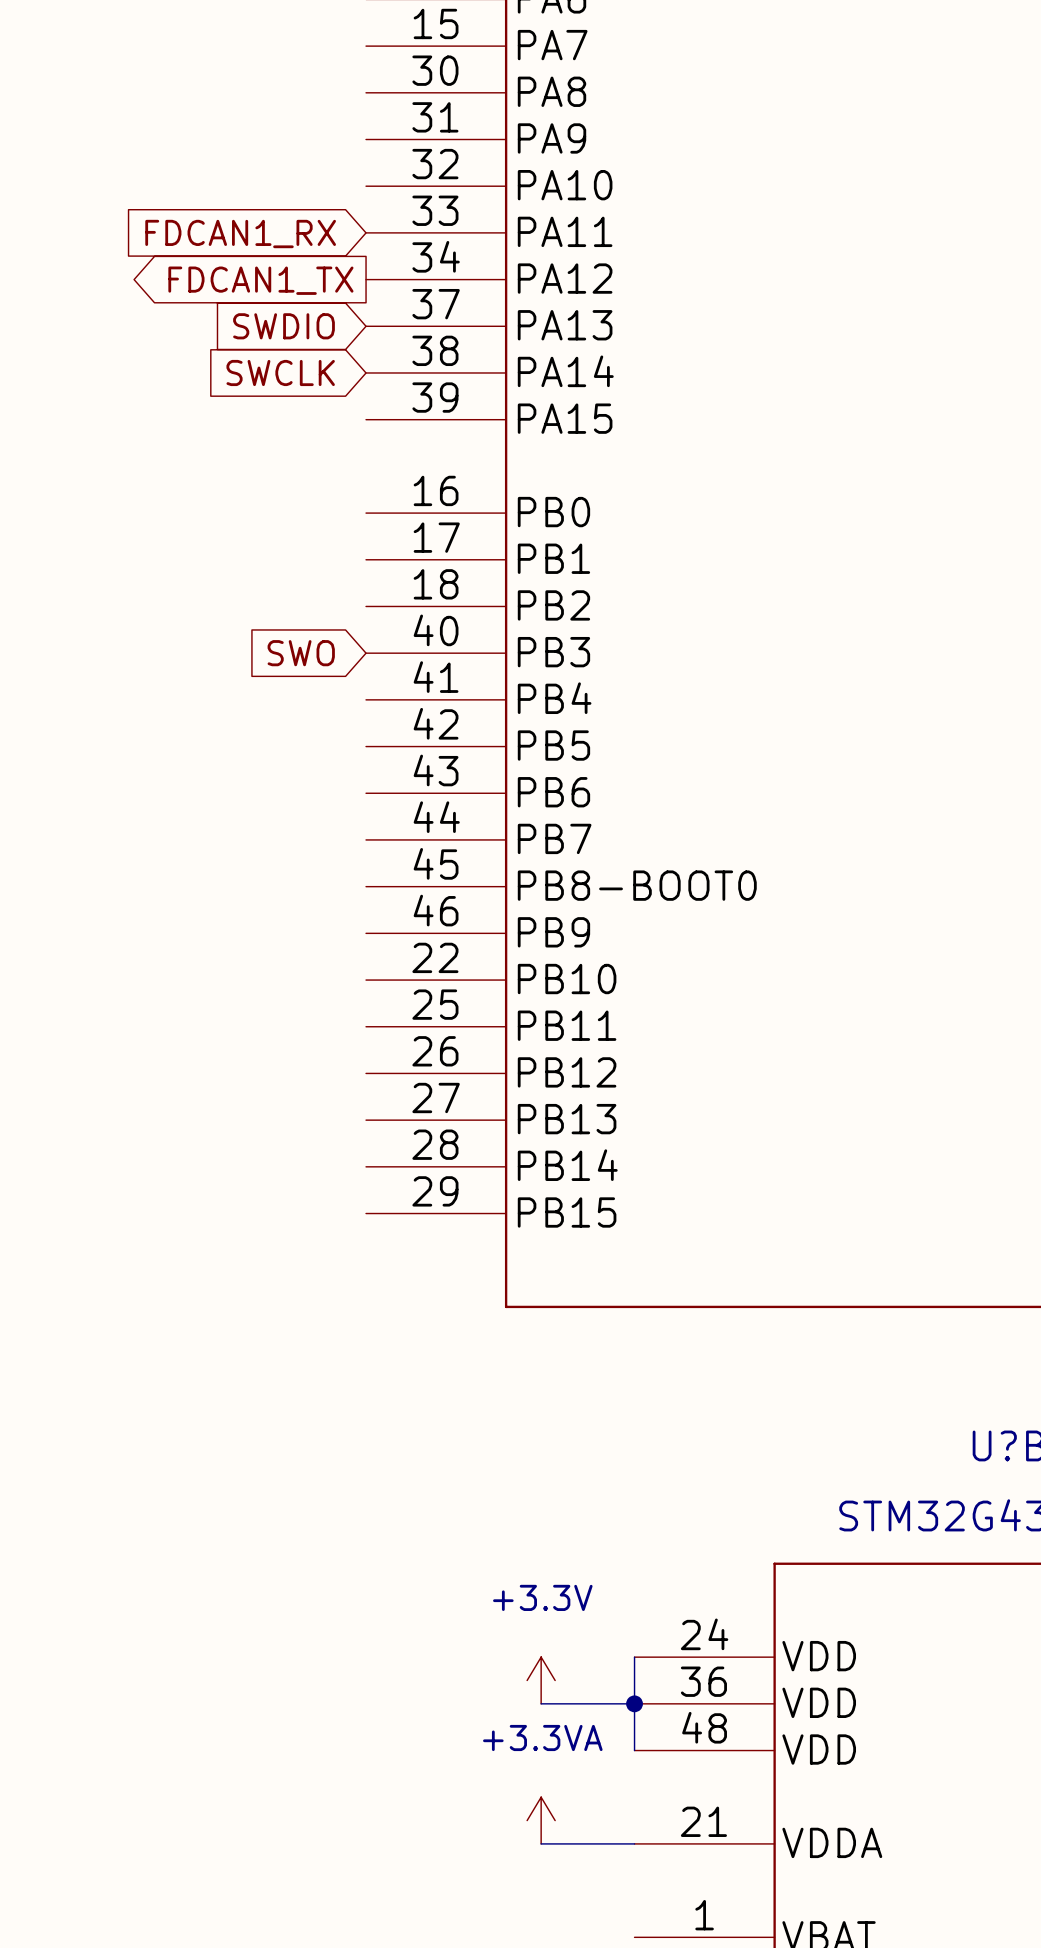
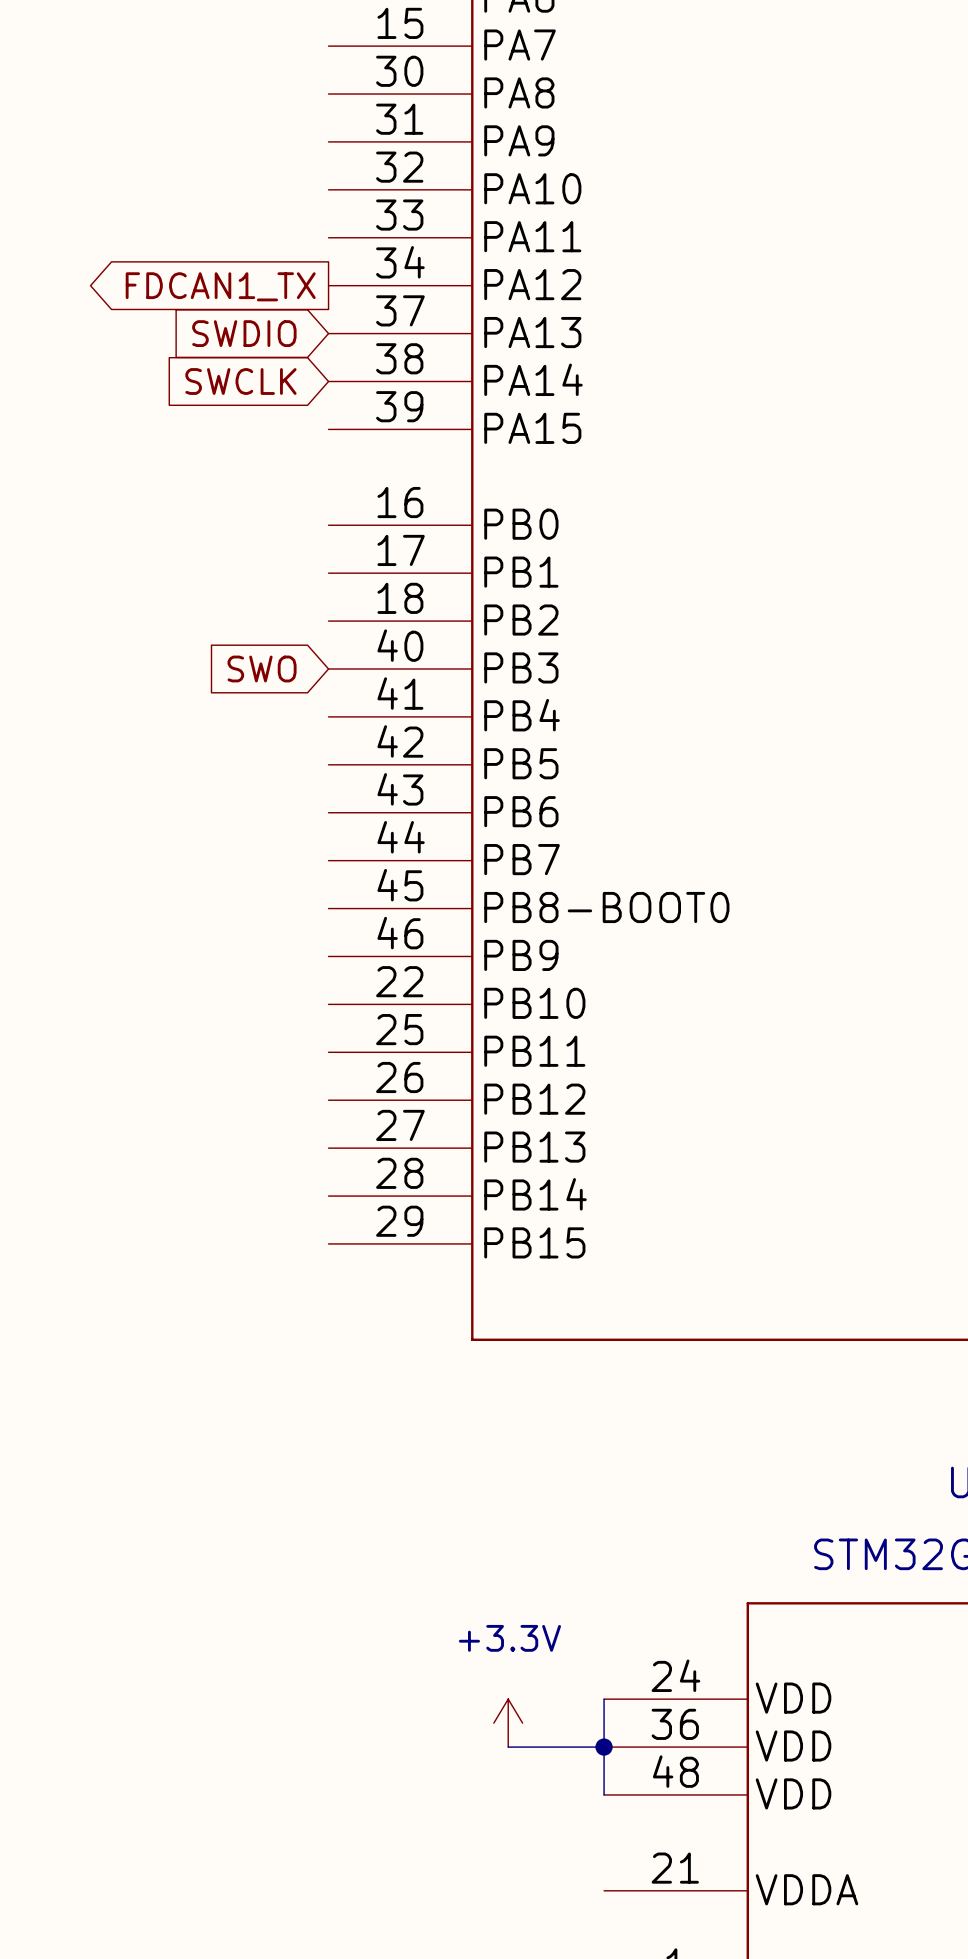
global label: FDCAN1_RX (240, 234) -> none
power symbol: +3.3VA (541, 1820) -> none
wire: (541, 1843) (634, 1843) -> none

